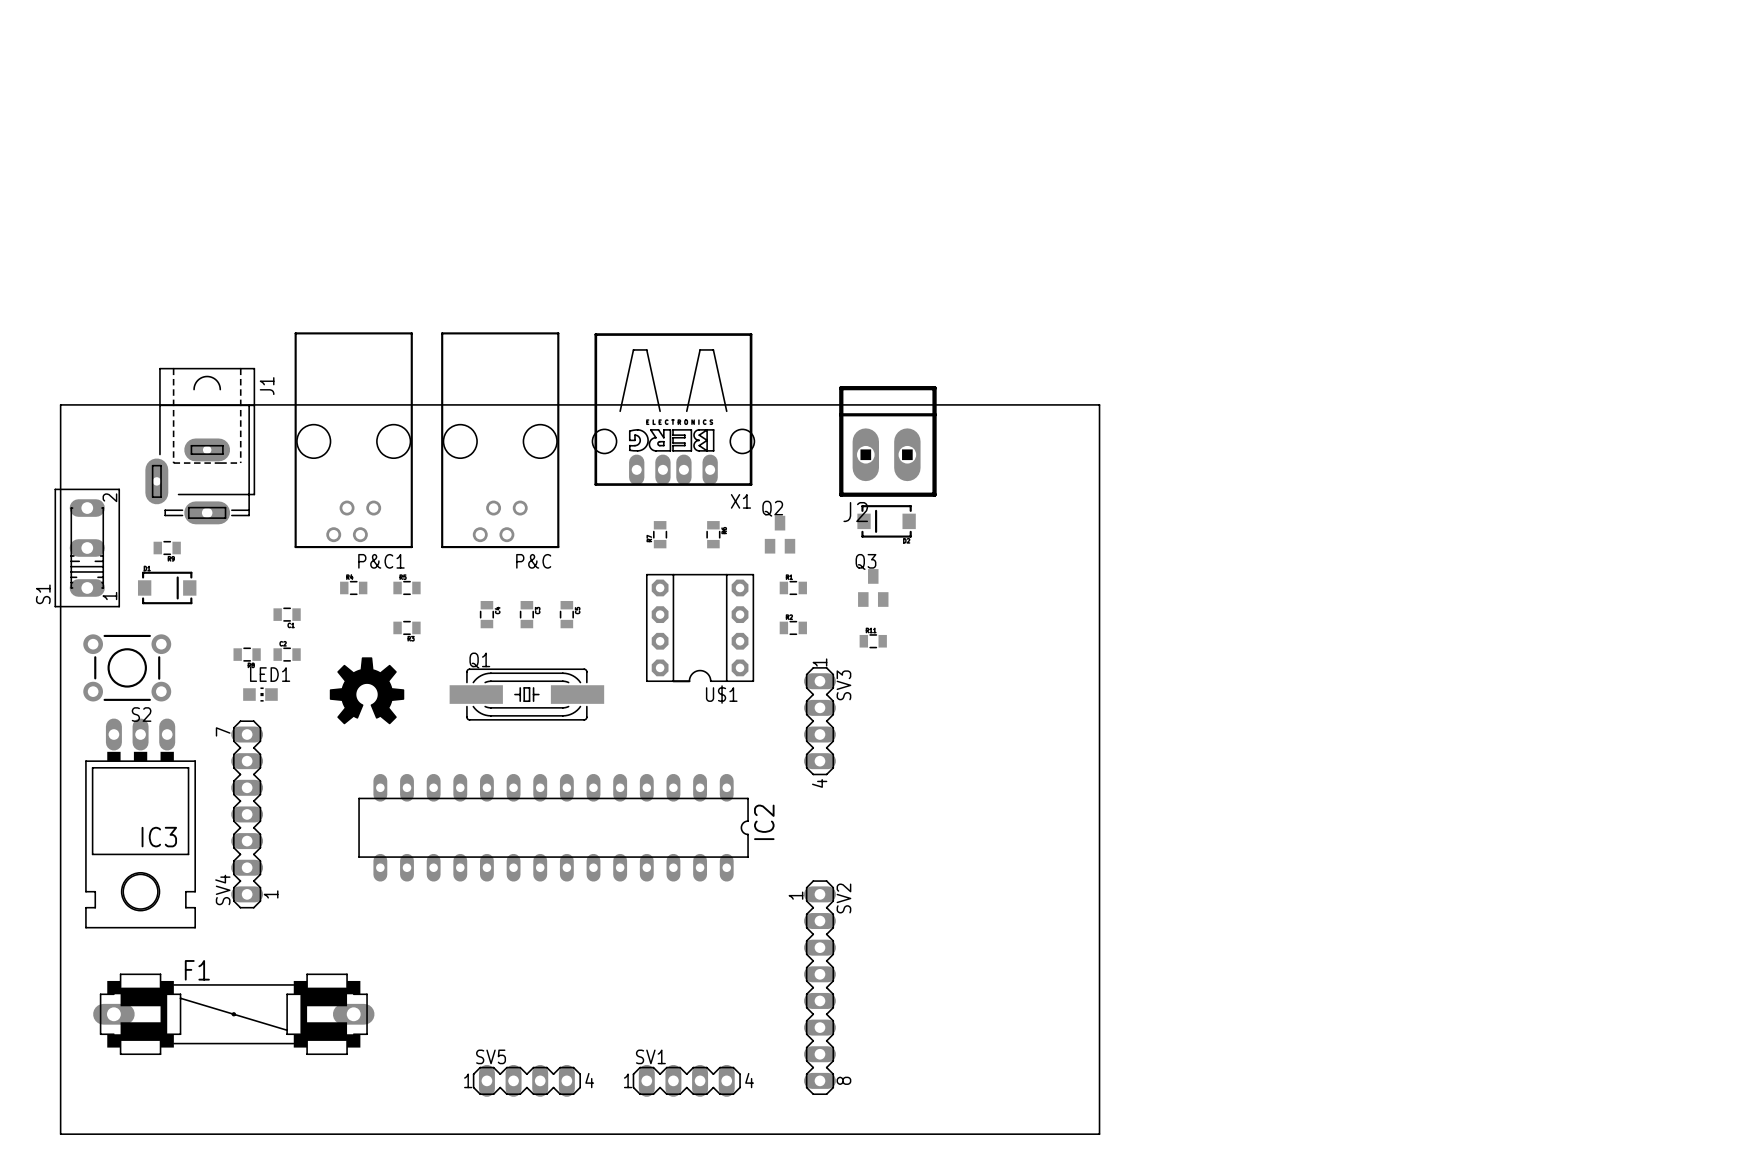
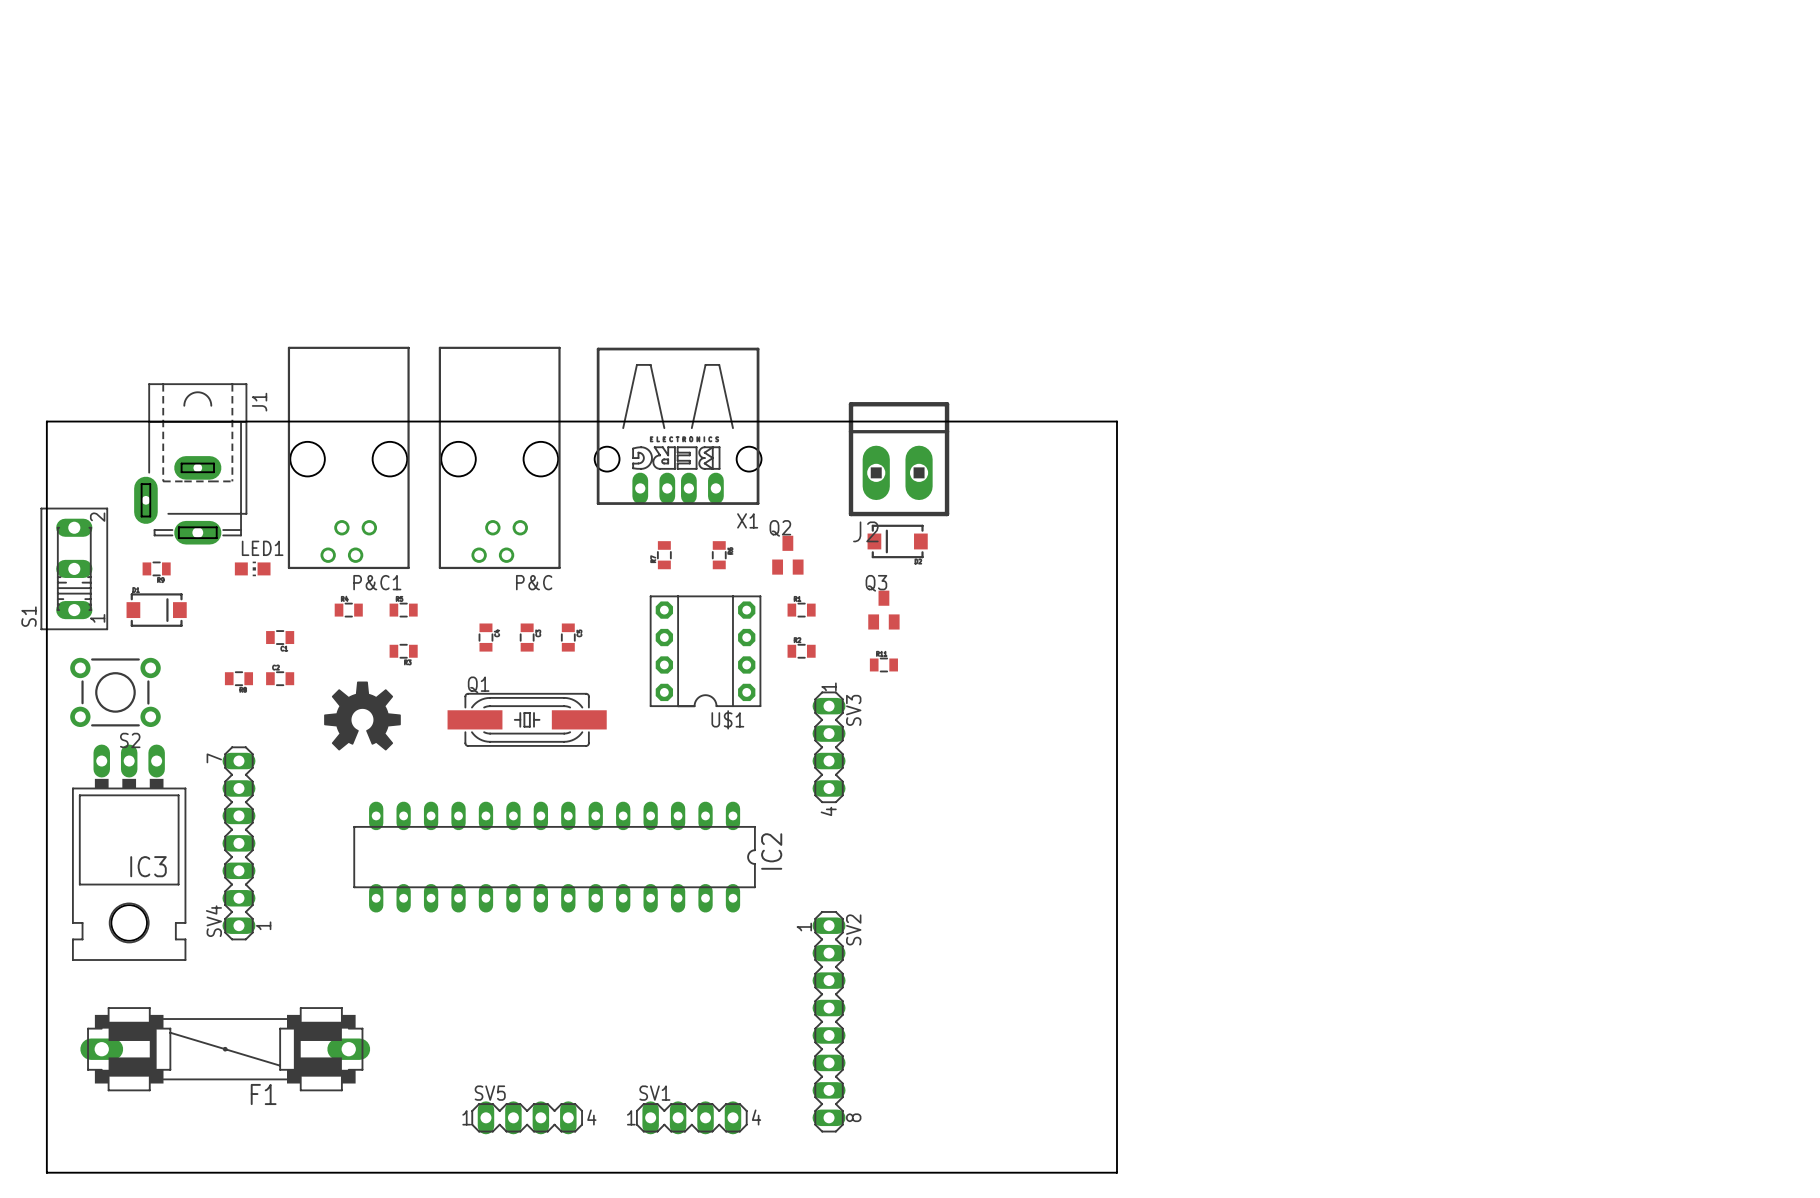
LED1 position: (260, 694) -> (252, 568)
F1 name position: F1 (197, 970) -> F1 (263, 1094)

